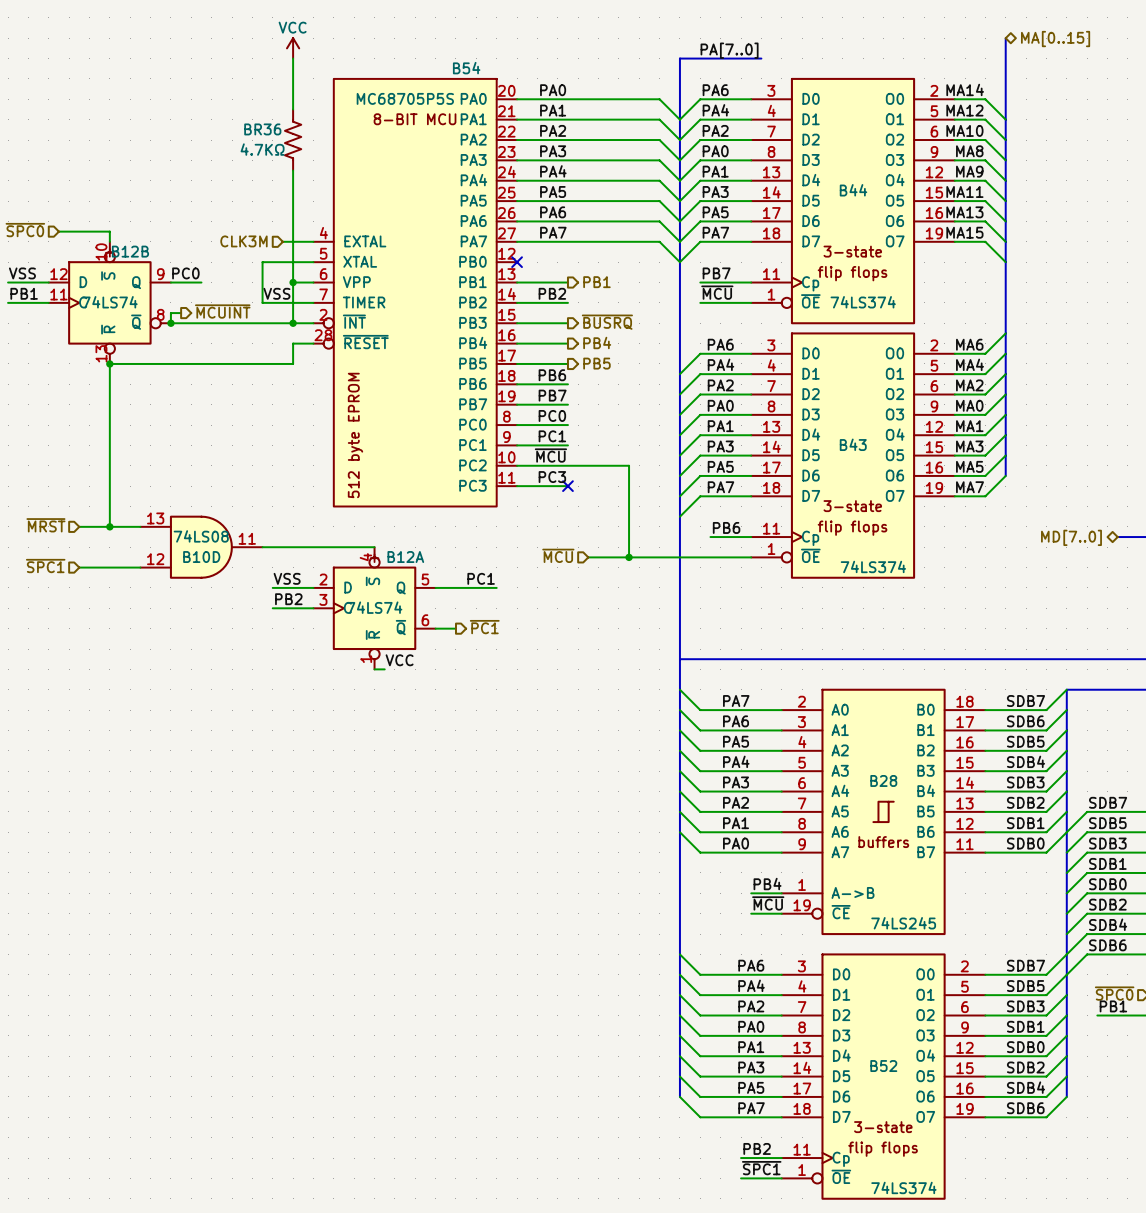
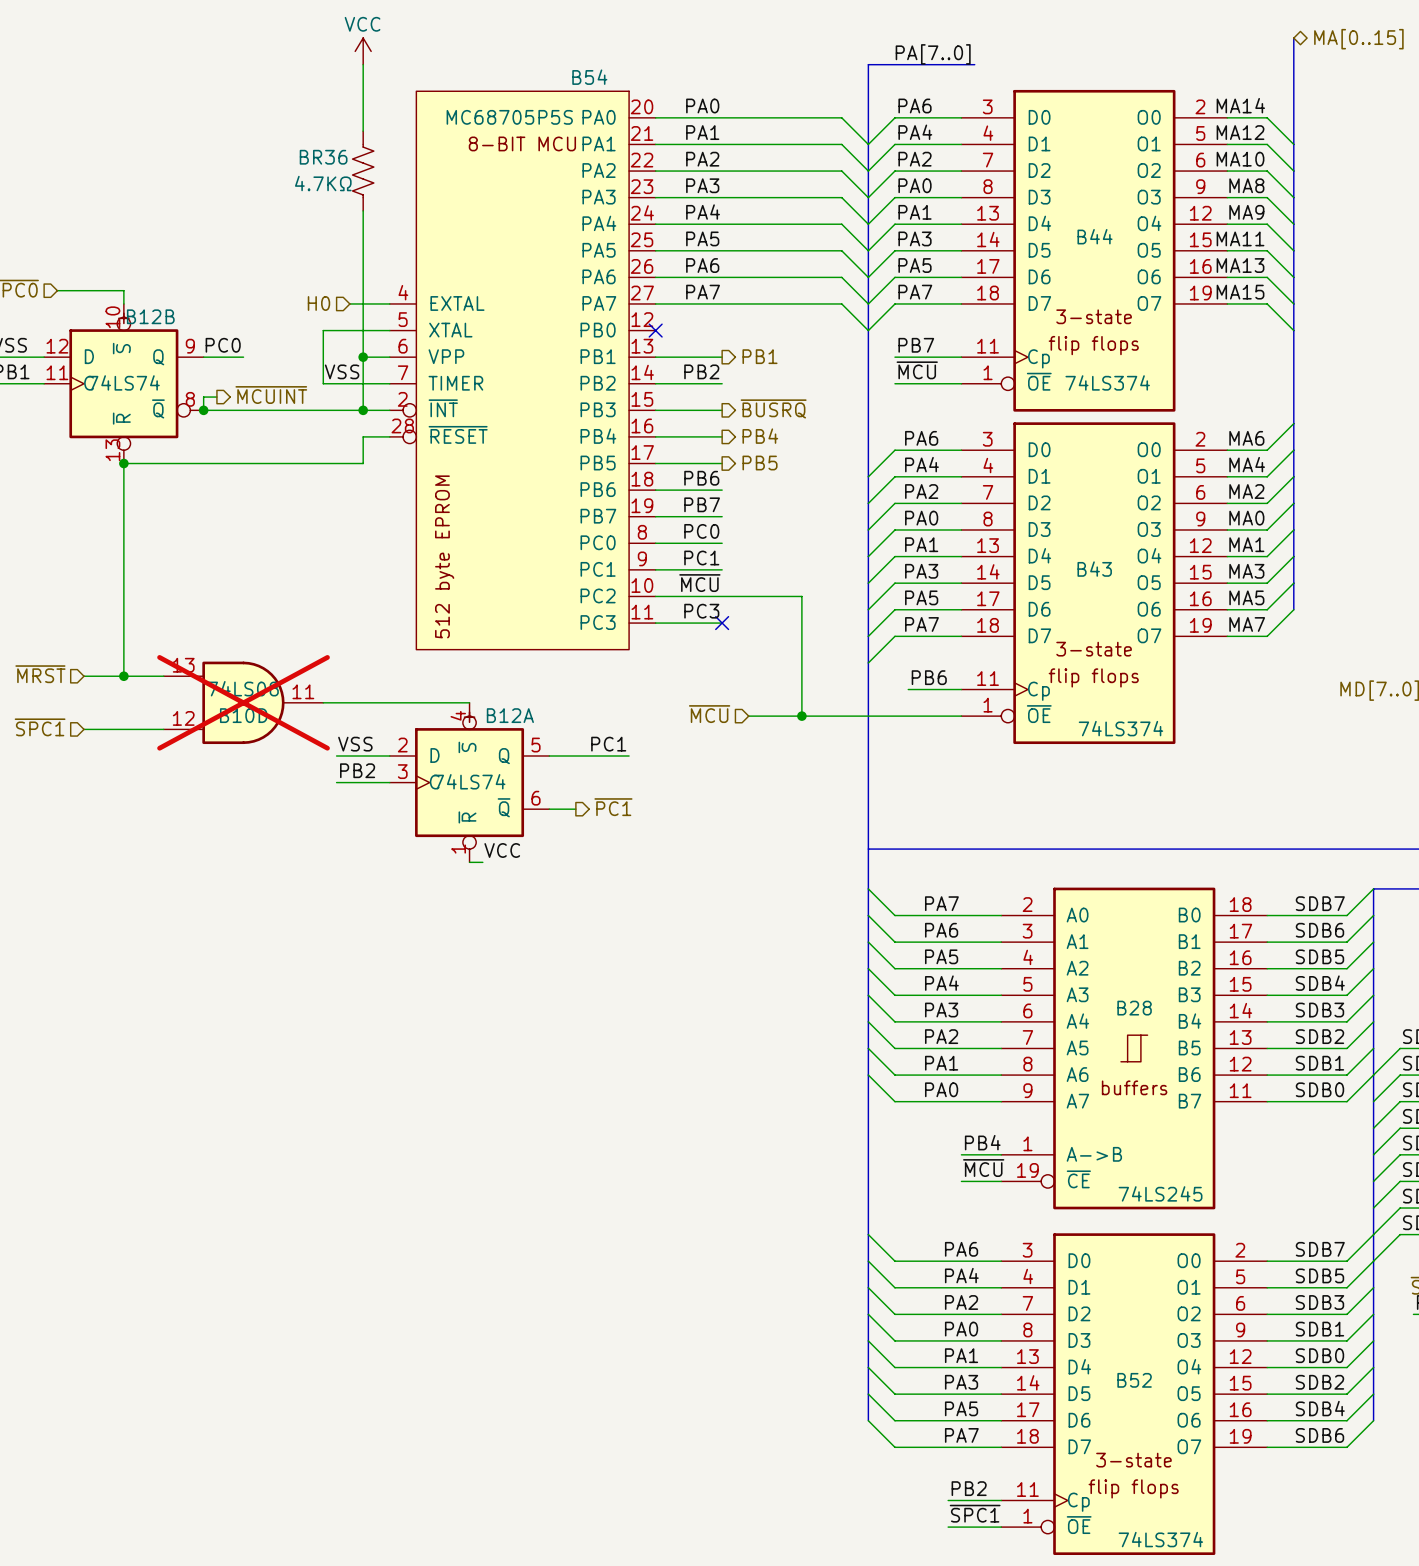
hierarchical label: CLK3M (243, 241) -> H0 (318, 303)
B10D do-not-place cross: none -> (243, 702)

